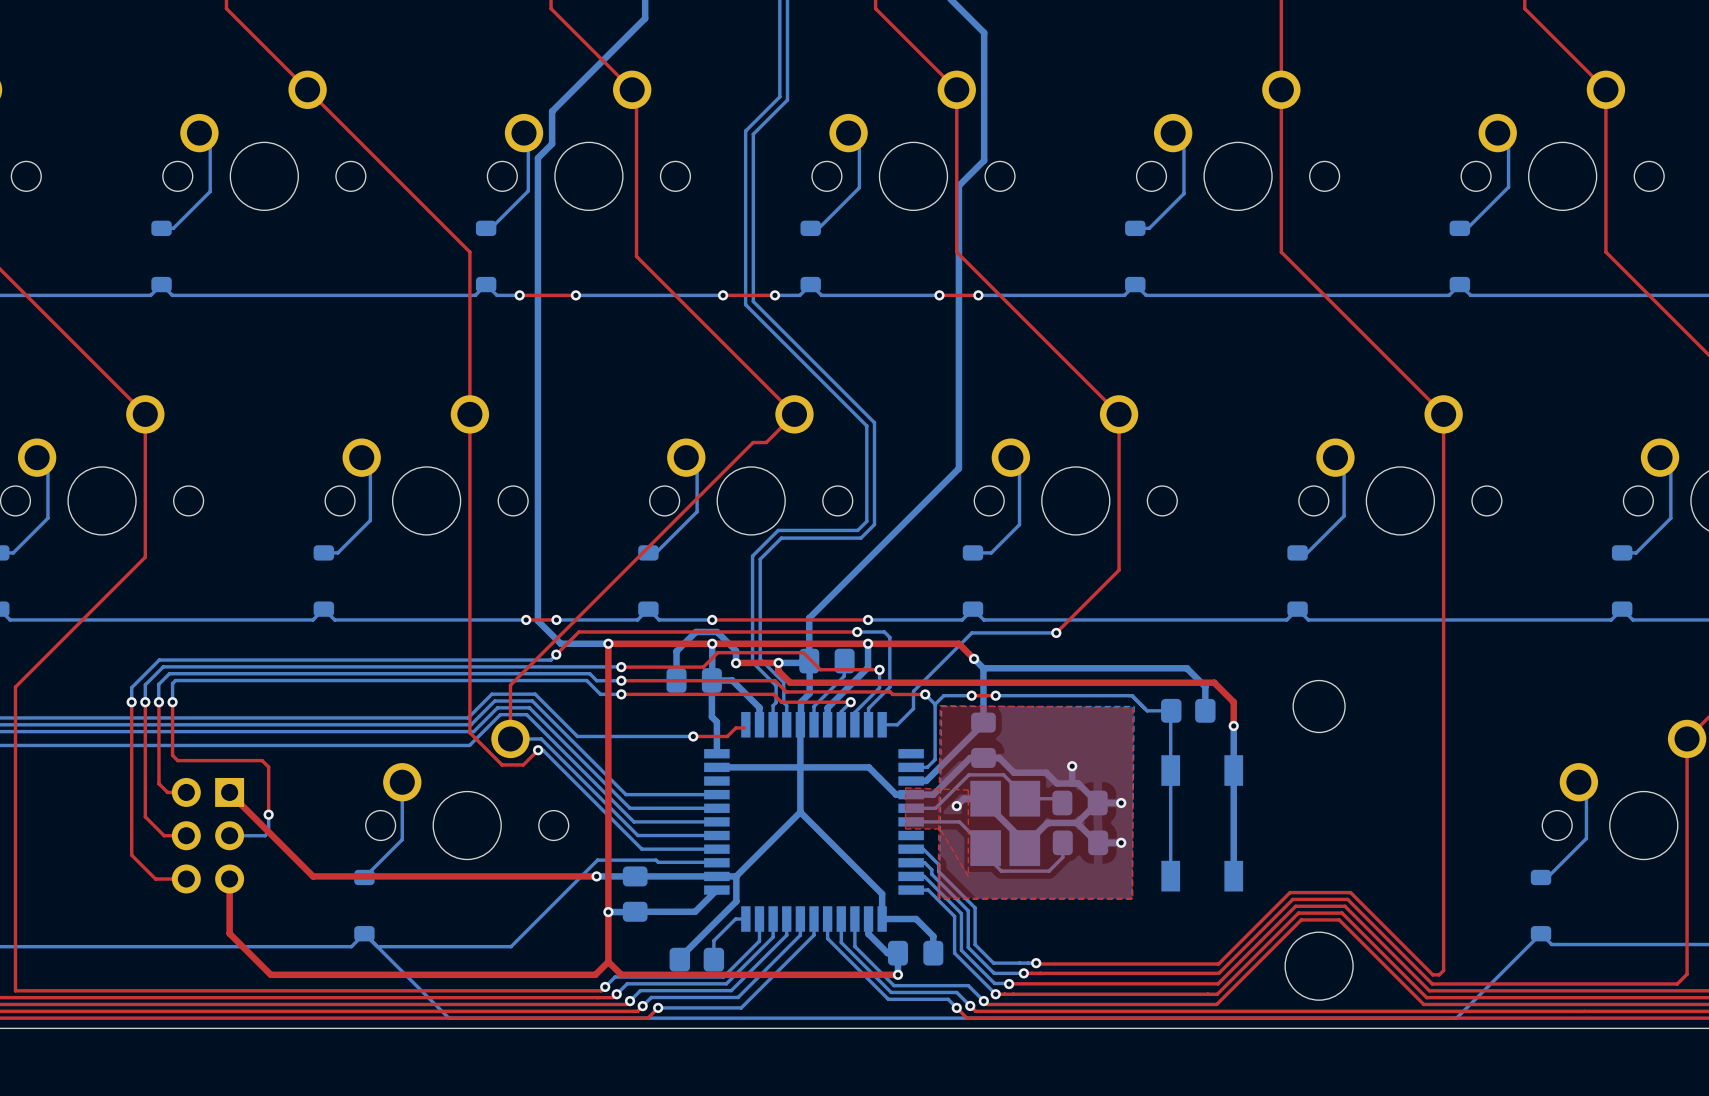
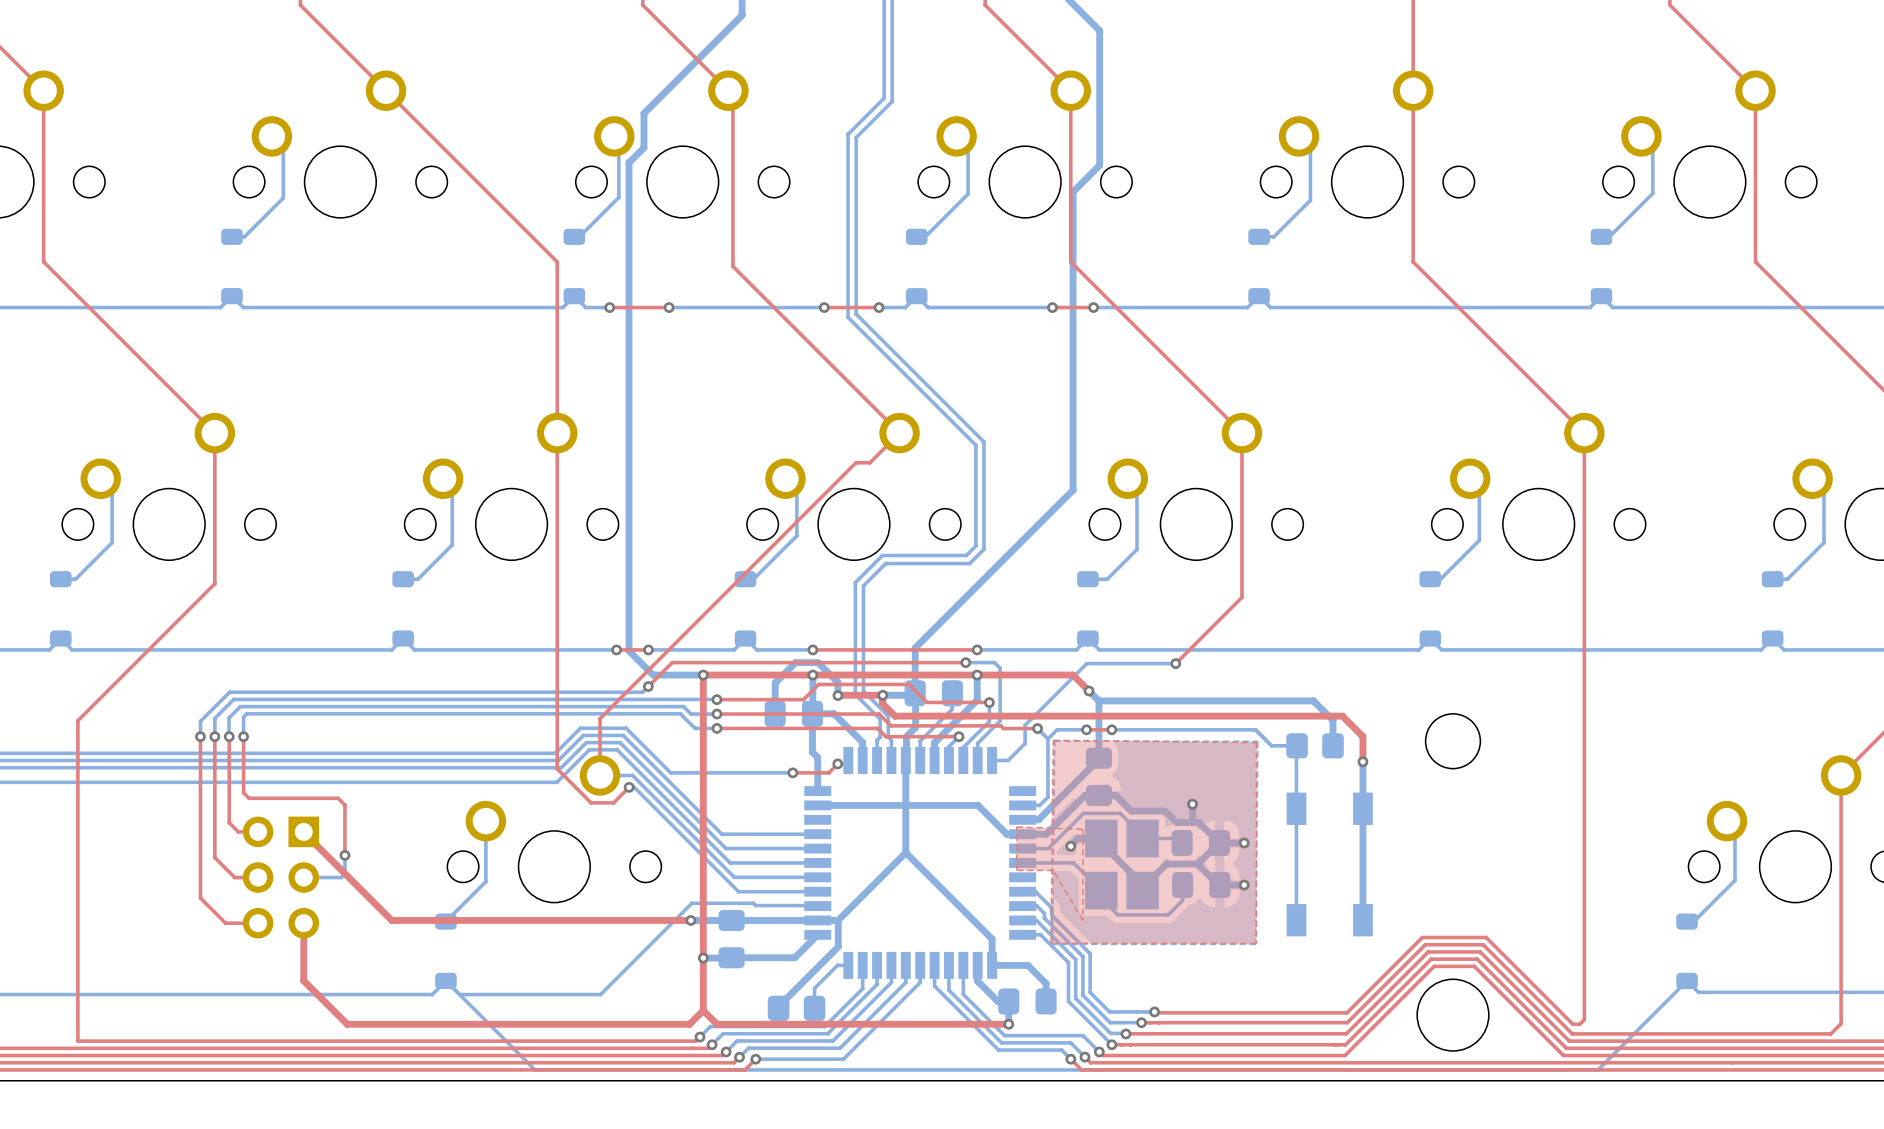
top track: (735, 727) (744, 727) -> none
via: none -> (837, 763)

